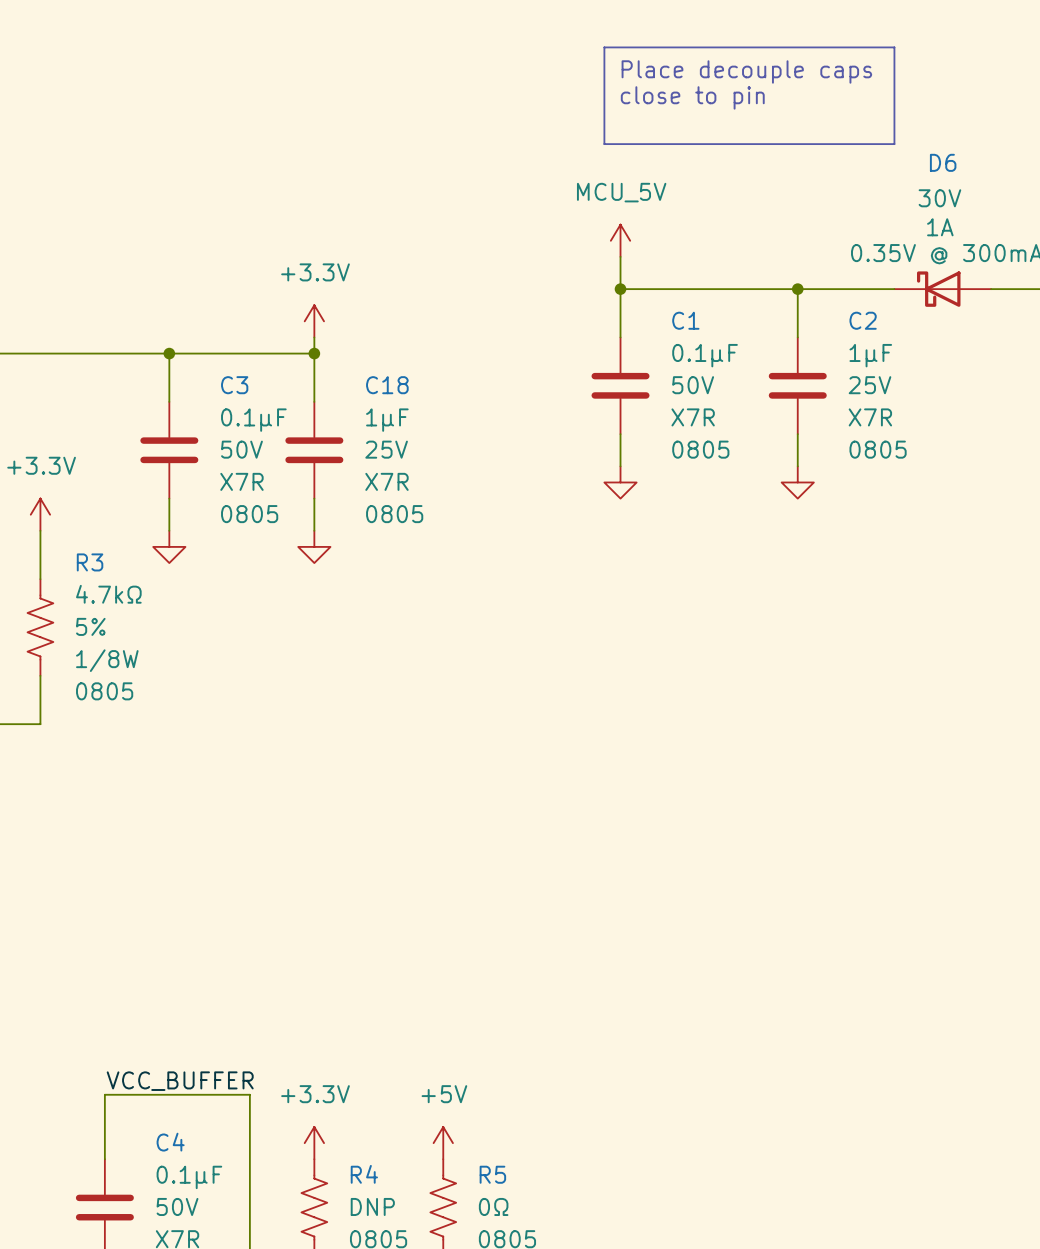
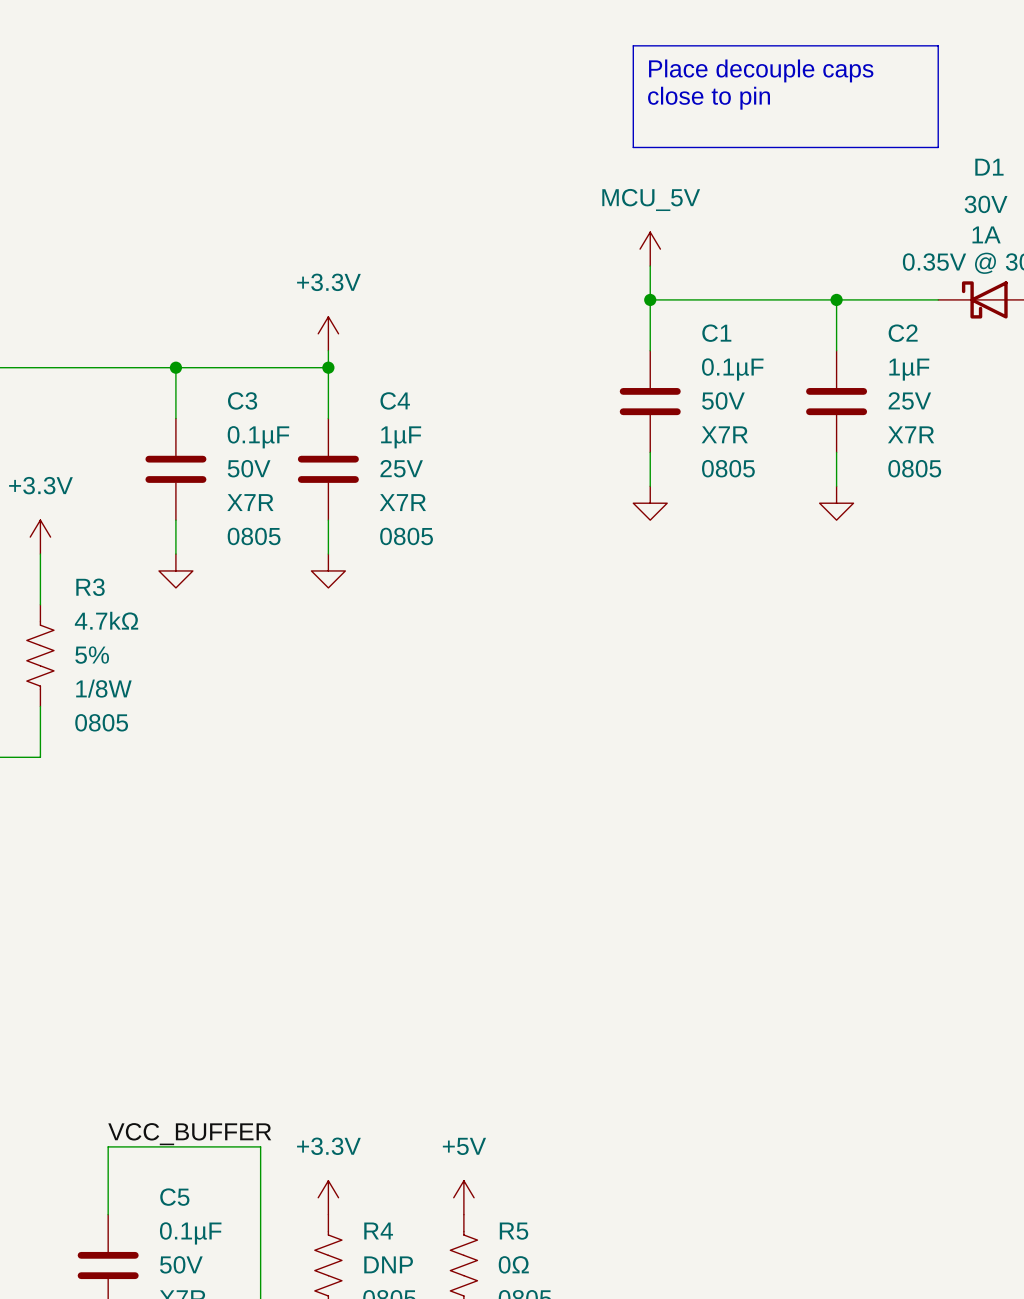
D6 name: D6 (943, 162) -> D1 (989, 167)
C18 name: C18 (387, 385) -> C4 (395, 400)
C4 name: C4 (170, 1142) -> C5 (174, 1197)

